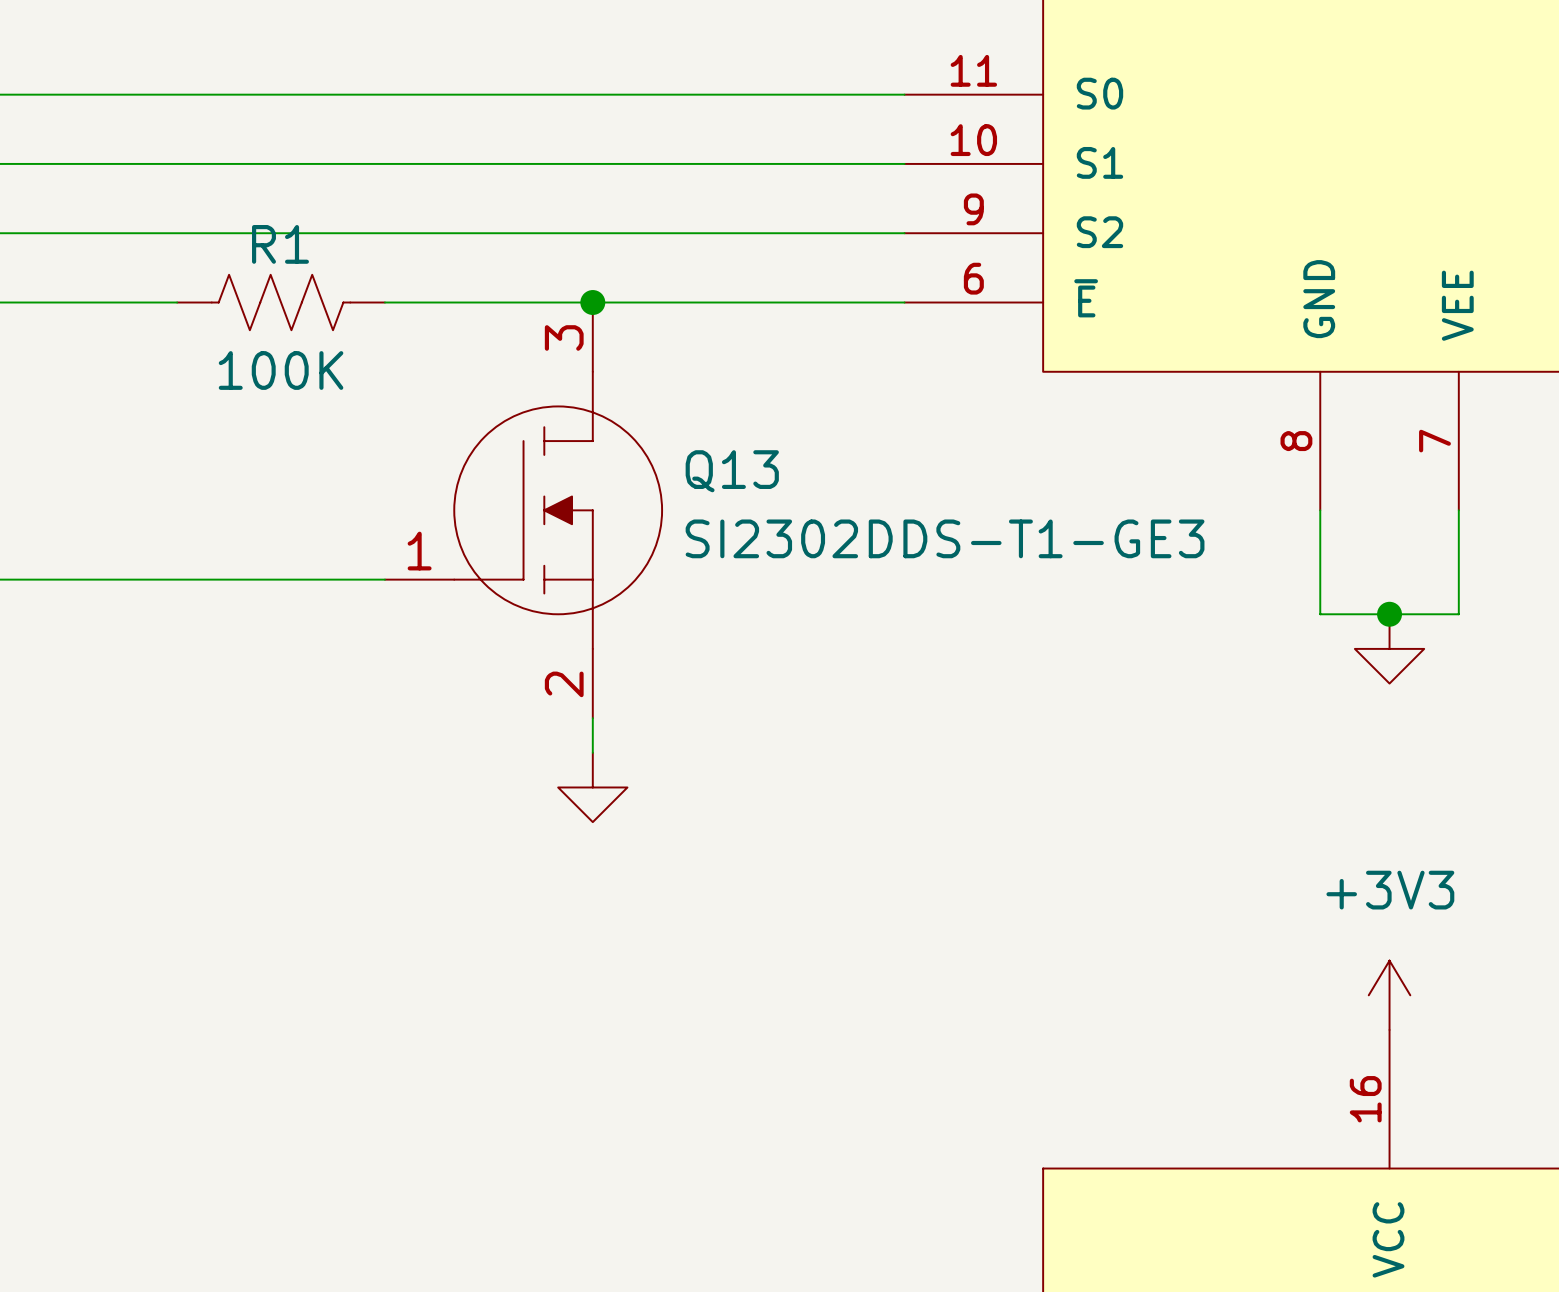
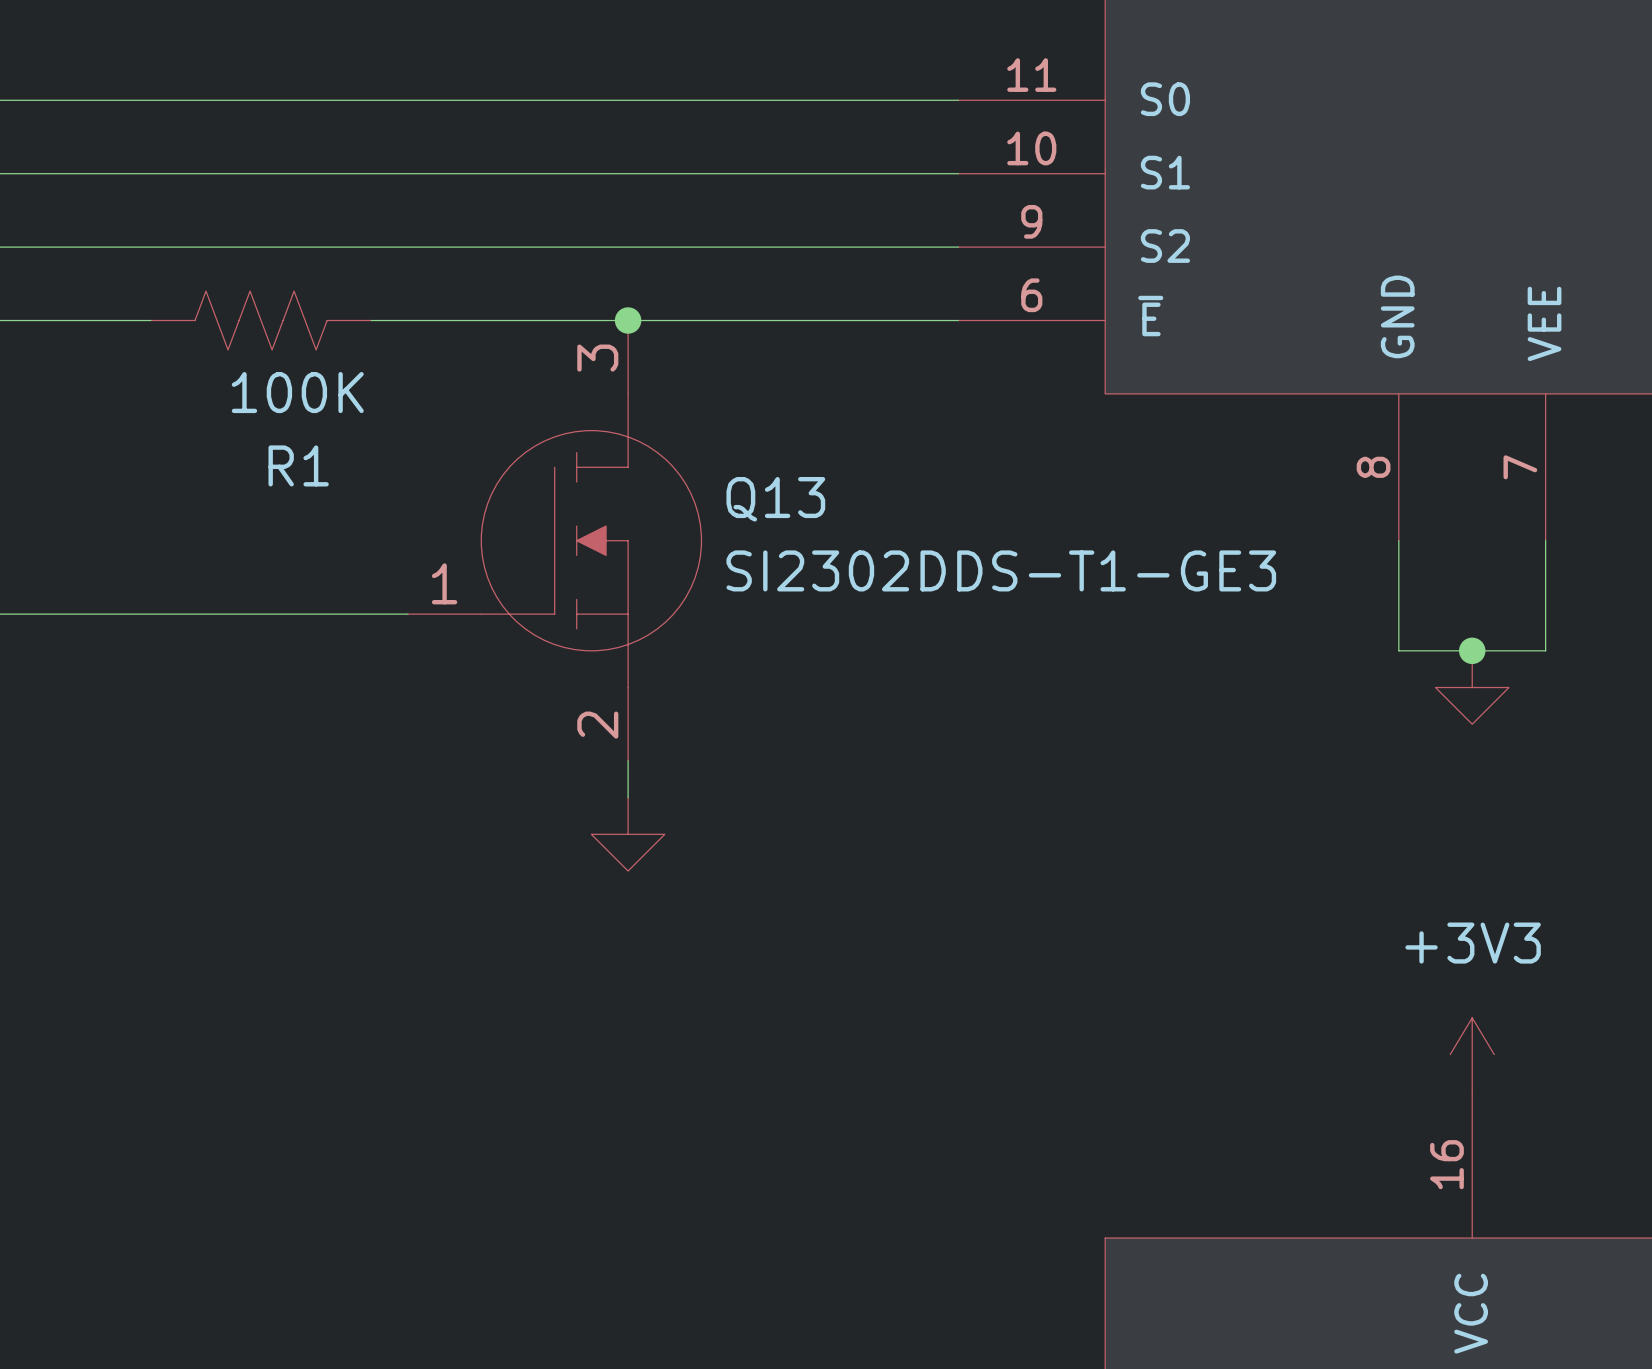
R1 name position: R1 (280, 244) -> R1 (298, 465)
R1 position: (281, 302) -> (261, 320)

